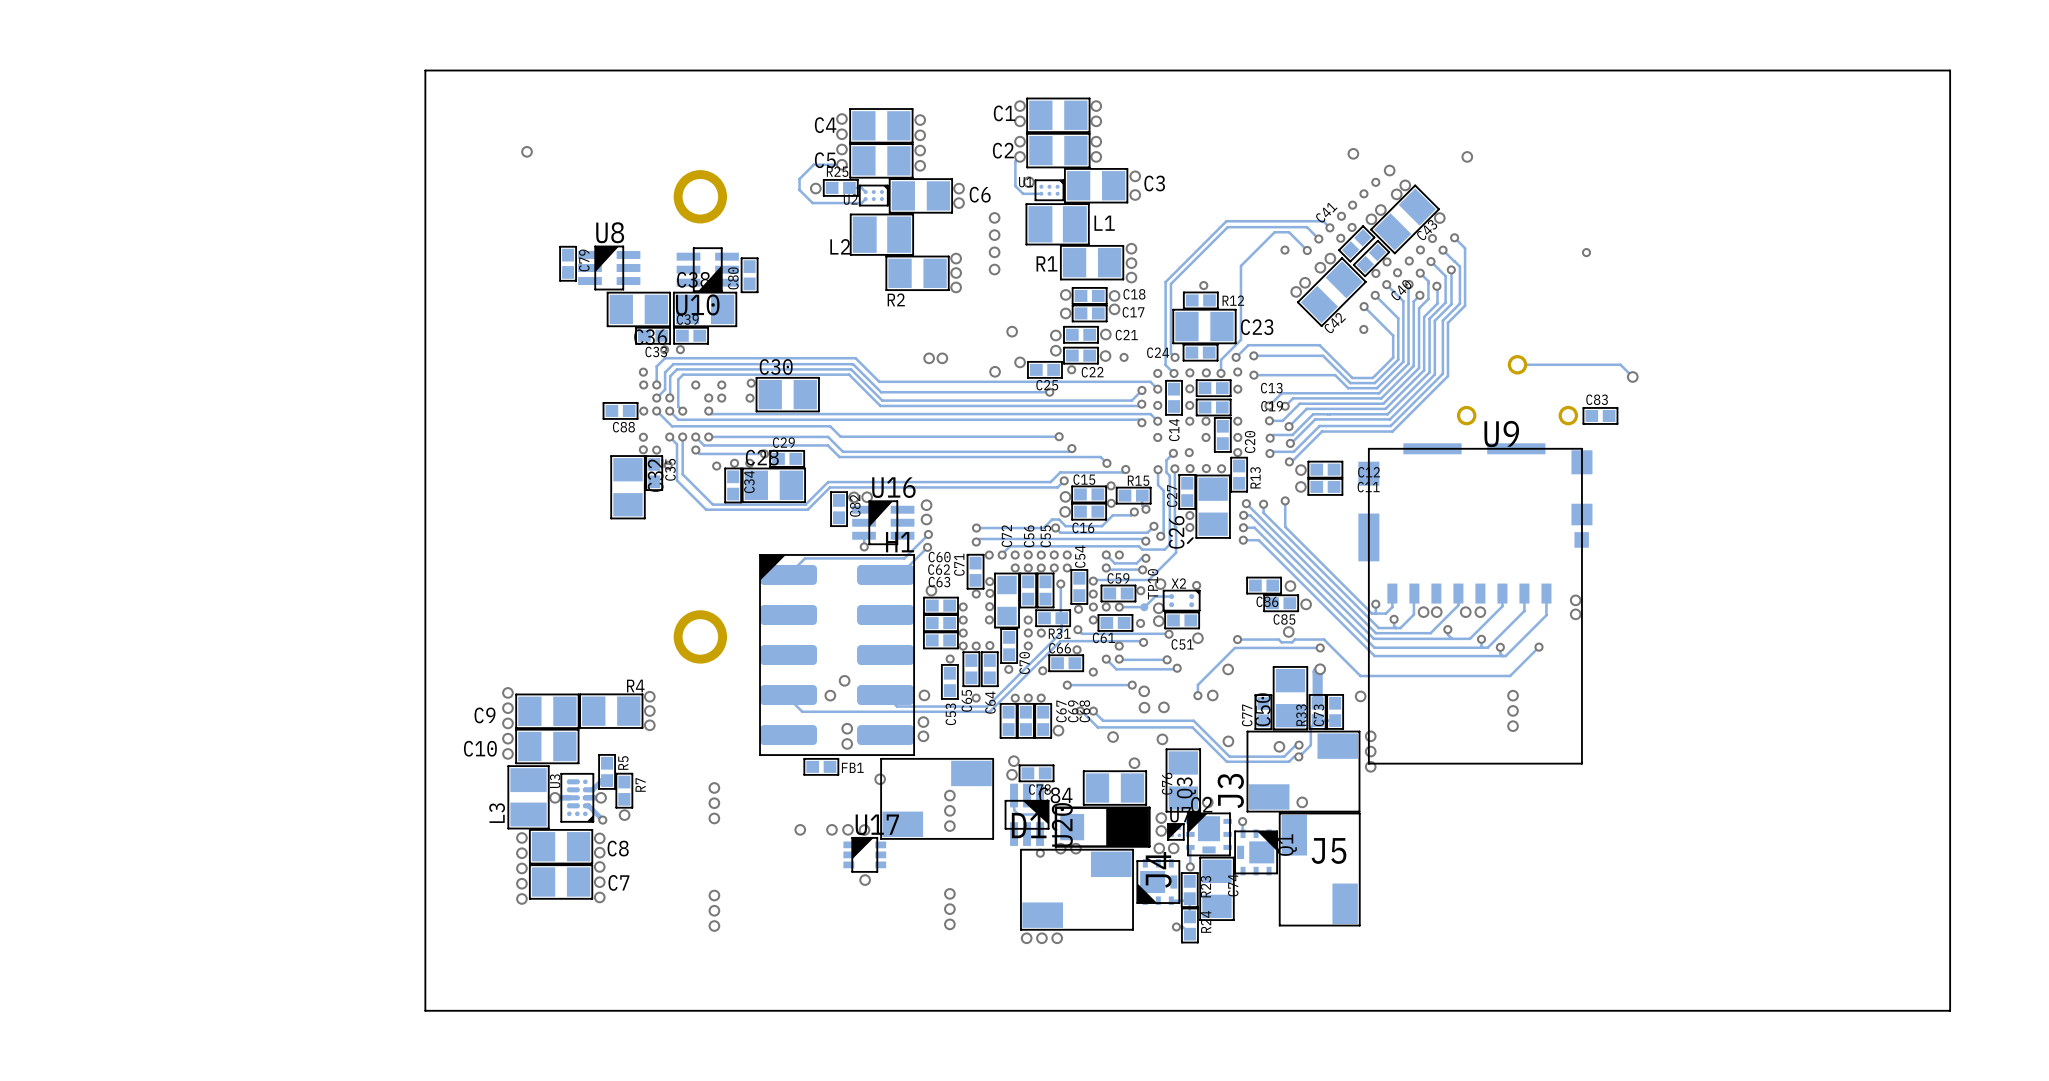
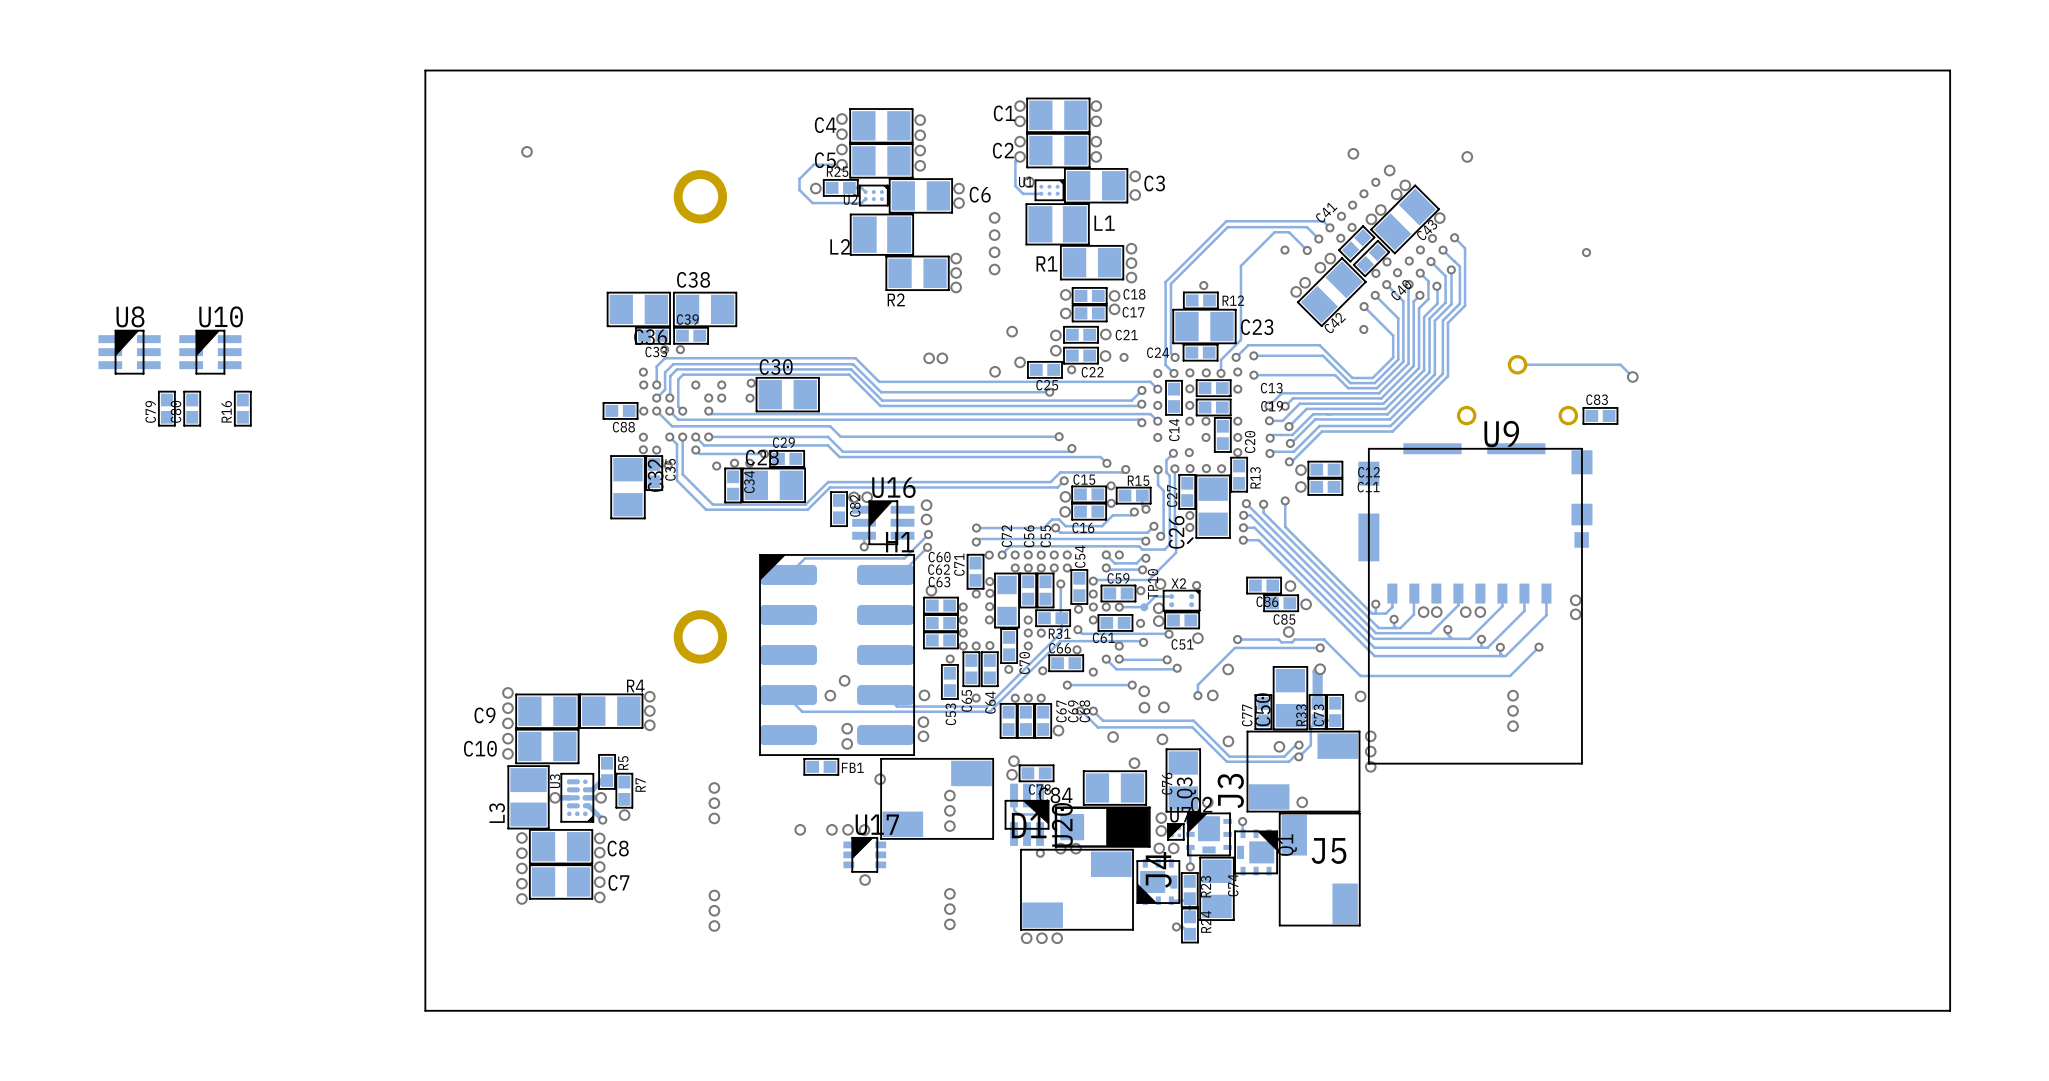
C79 name position: C79 (584, 260) -> C79 (150, 411)
C79 position: (568, 263) -> (166, 408)
U8 position: (609, 268) -> (129, 352)
U10 rotation: 0° (707, 269) -> 180° (210, 352)
U10 position: (707, 269) -> (210, 352)
C80 position: (749, 275) -> (192, 408)
R16: none -> (242, 408)

